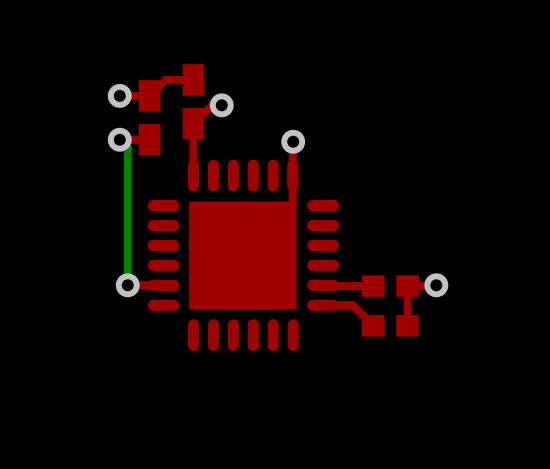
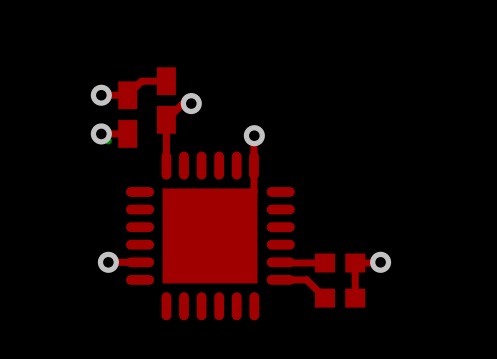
bottom track: (127, 147) (127, 285) -> none

